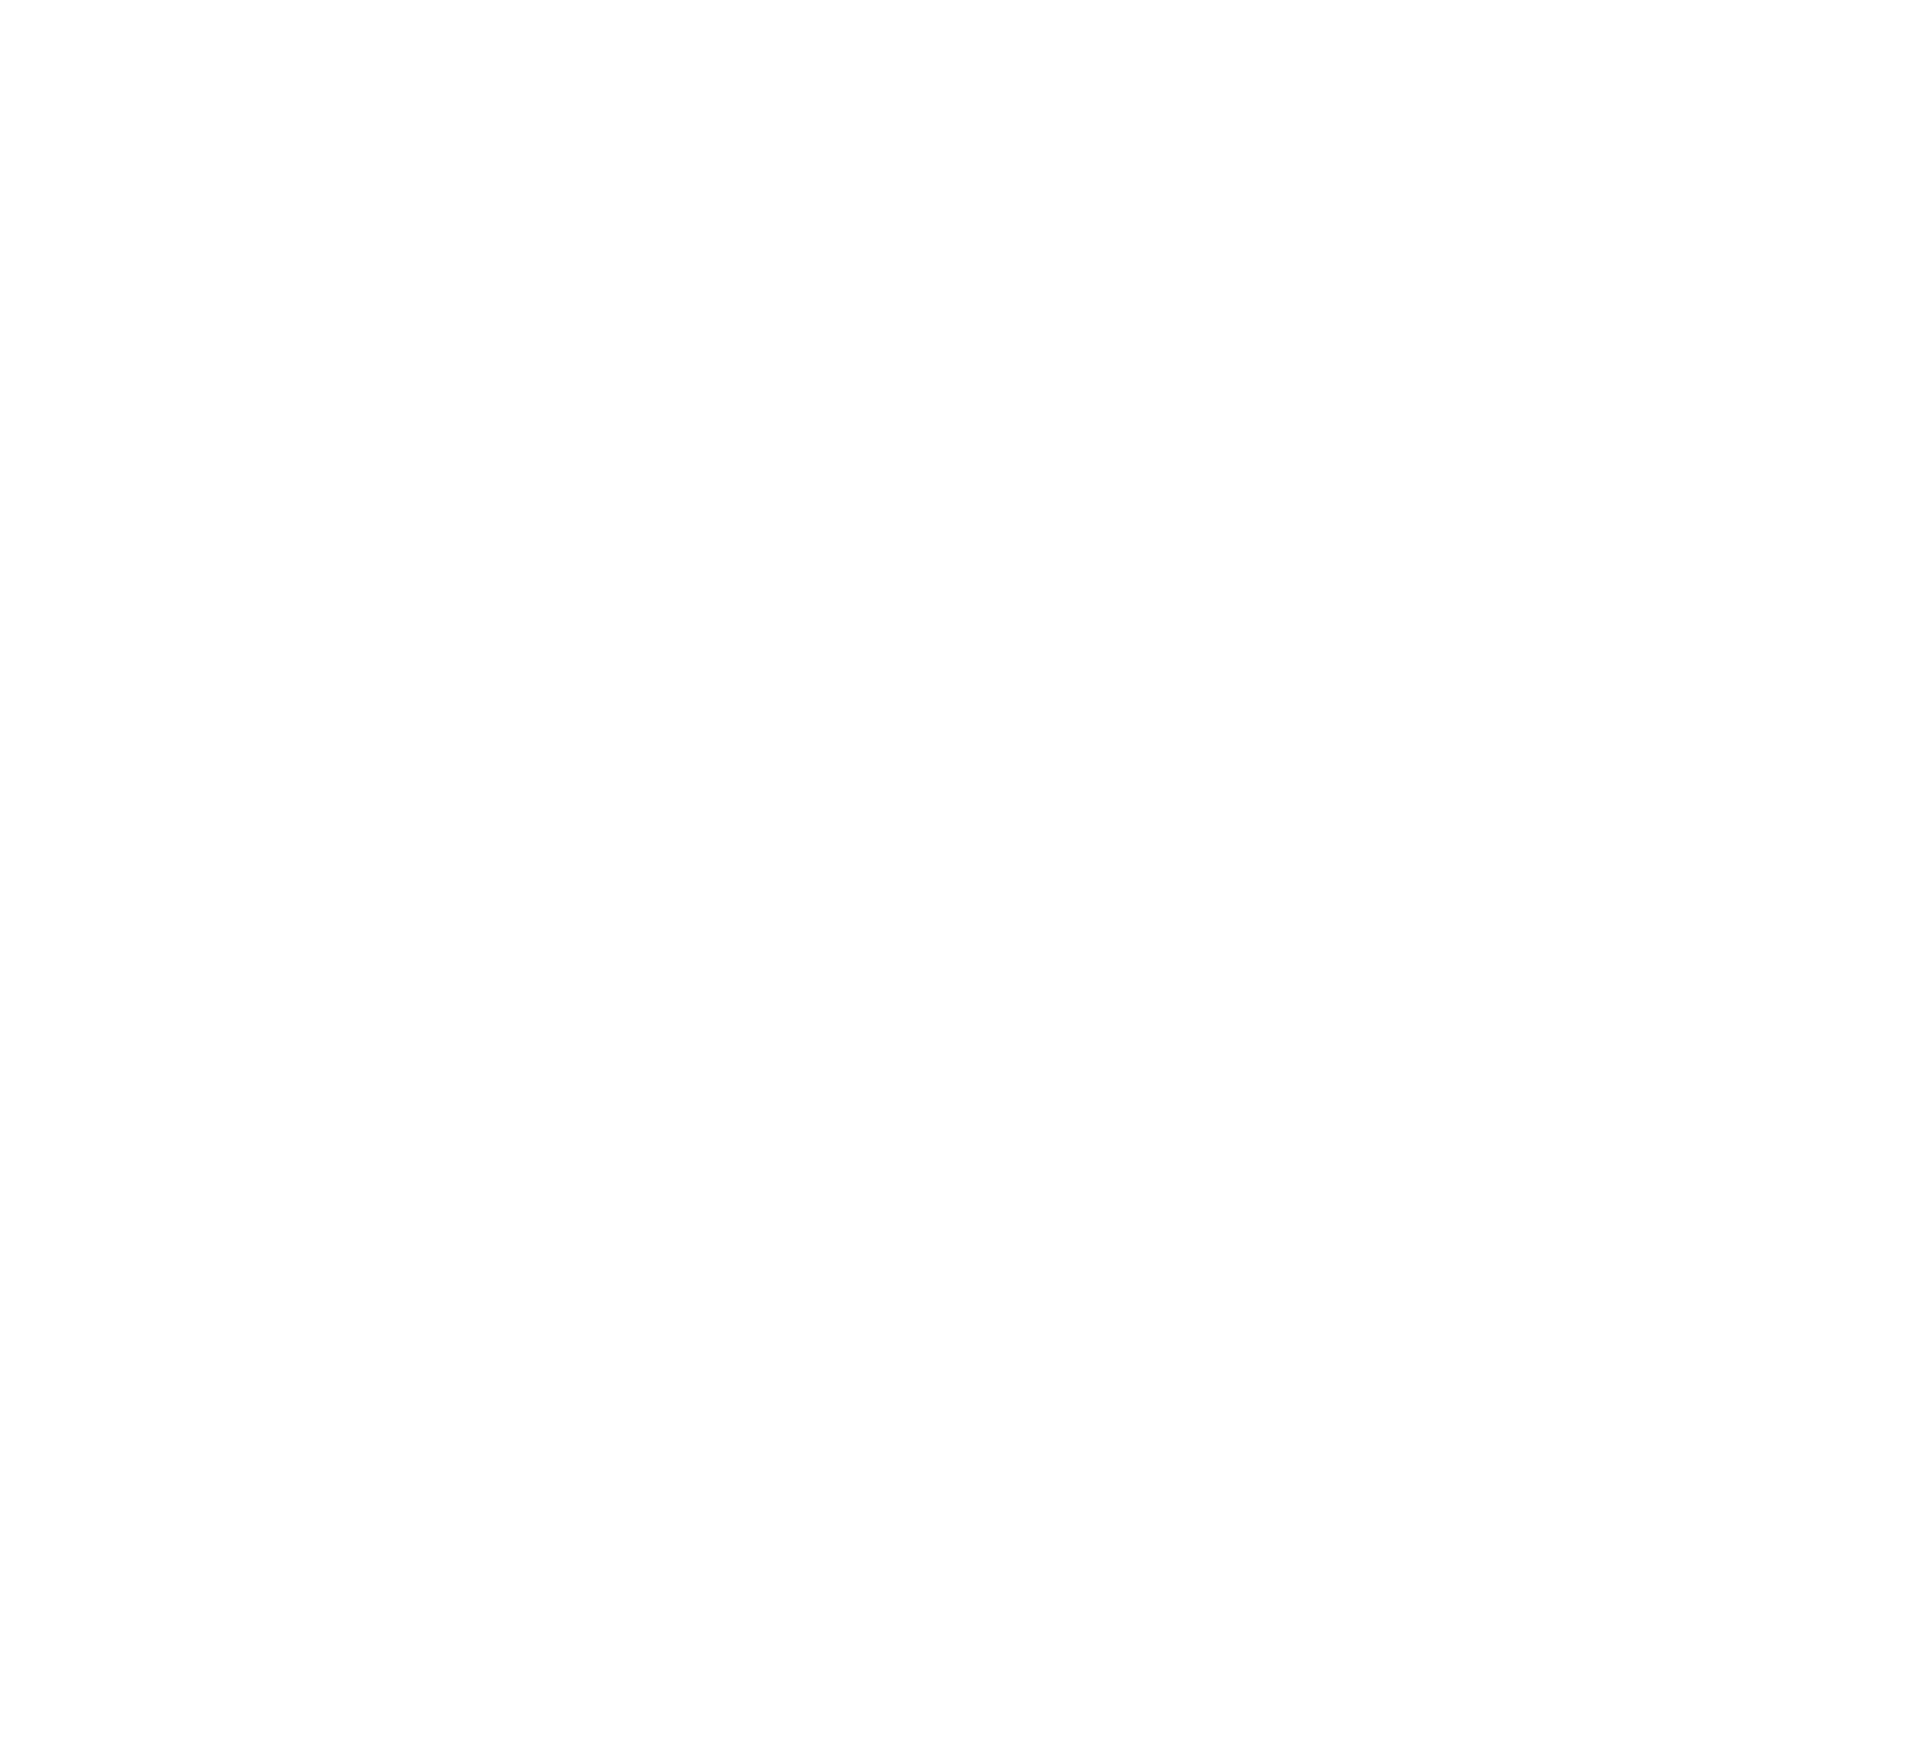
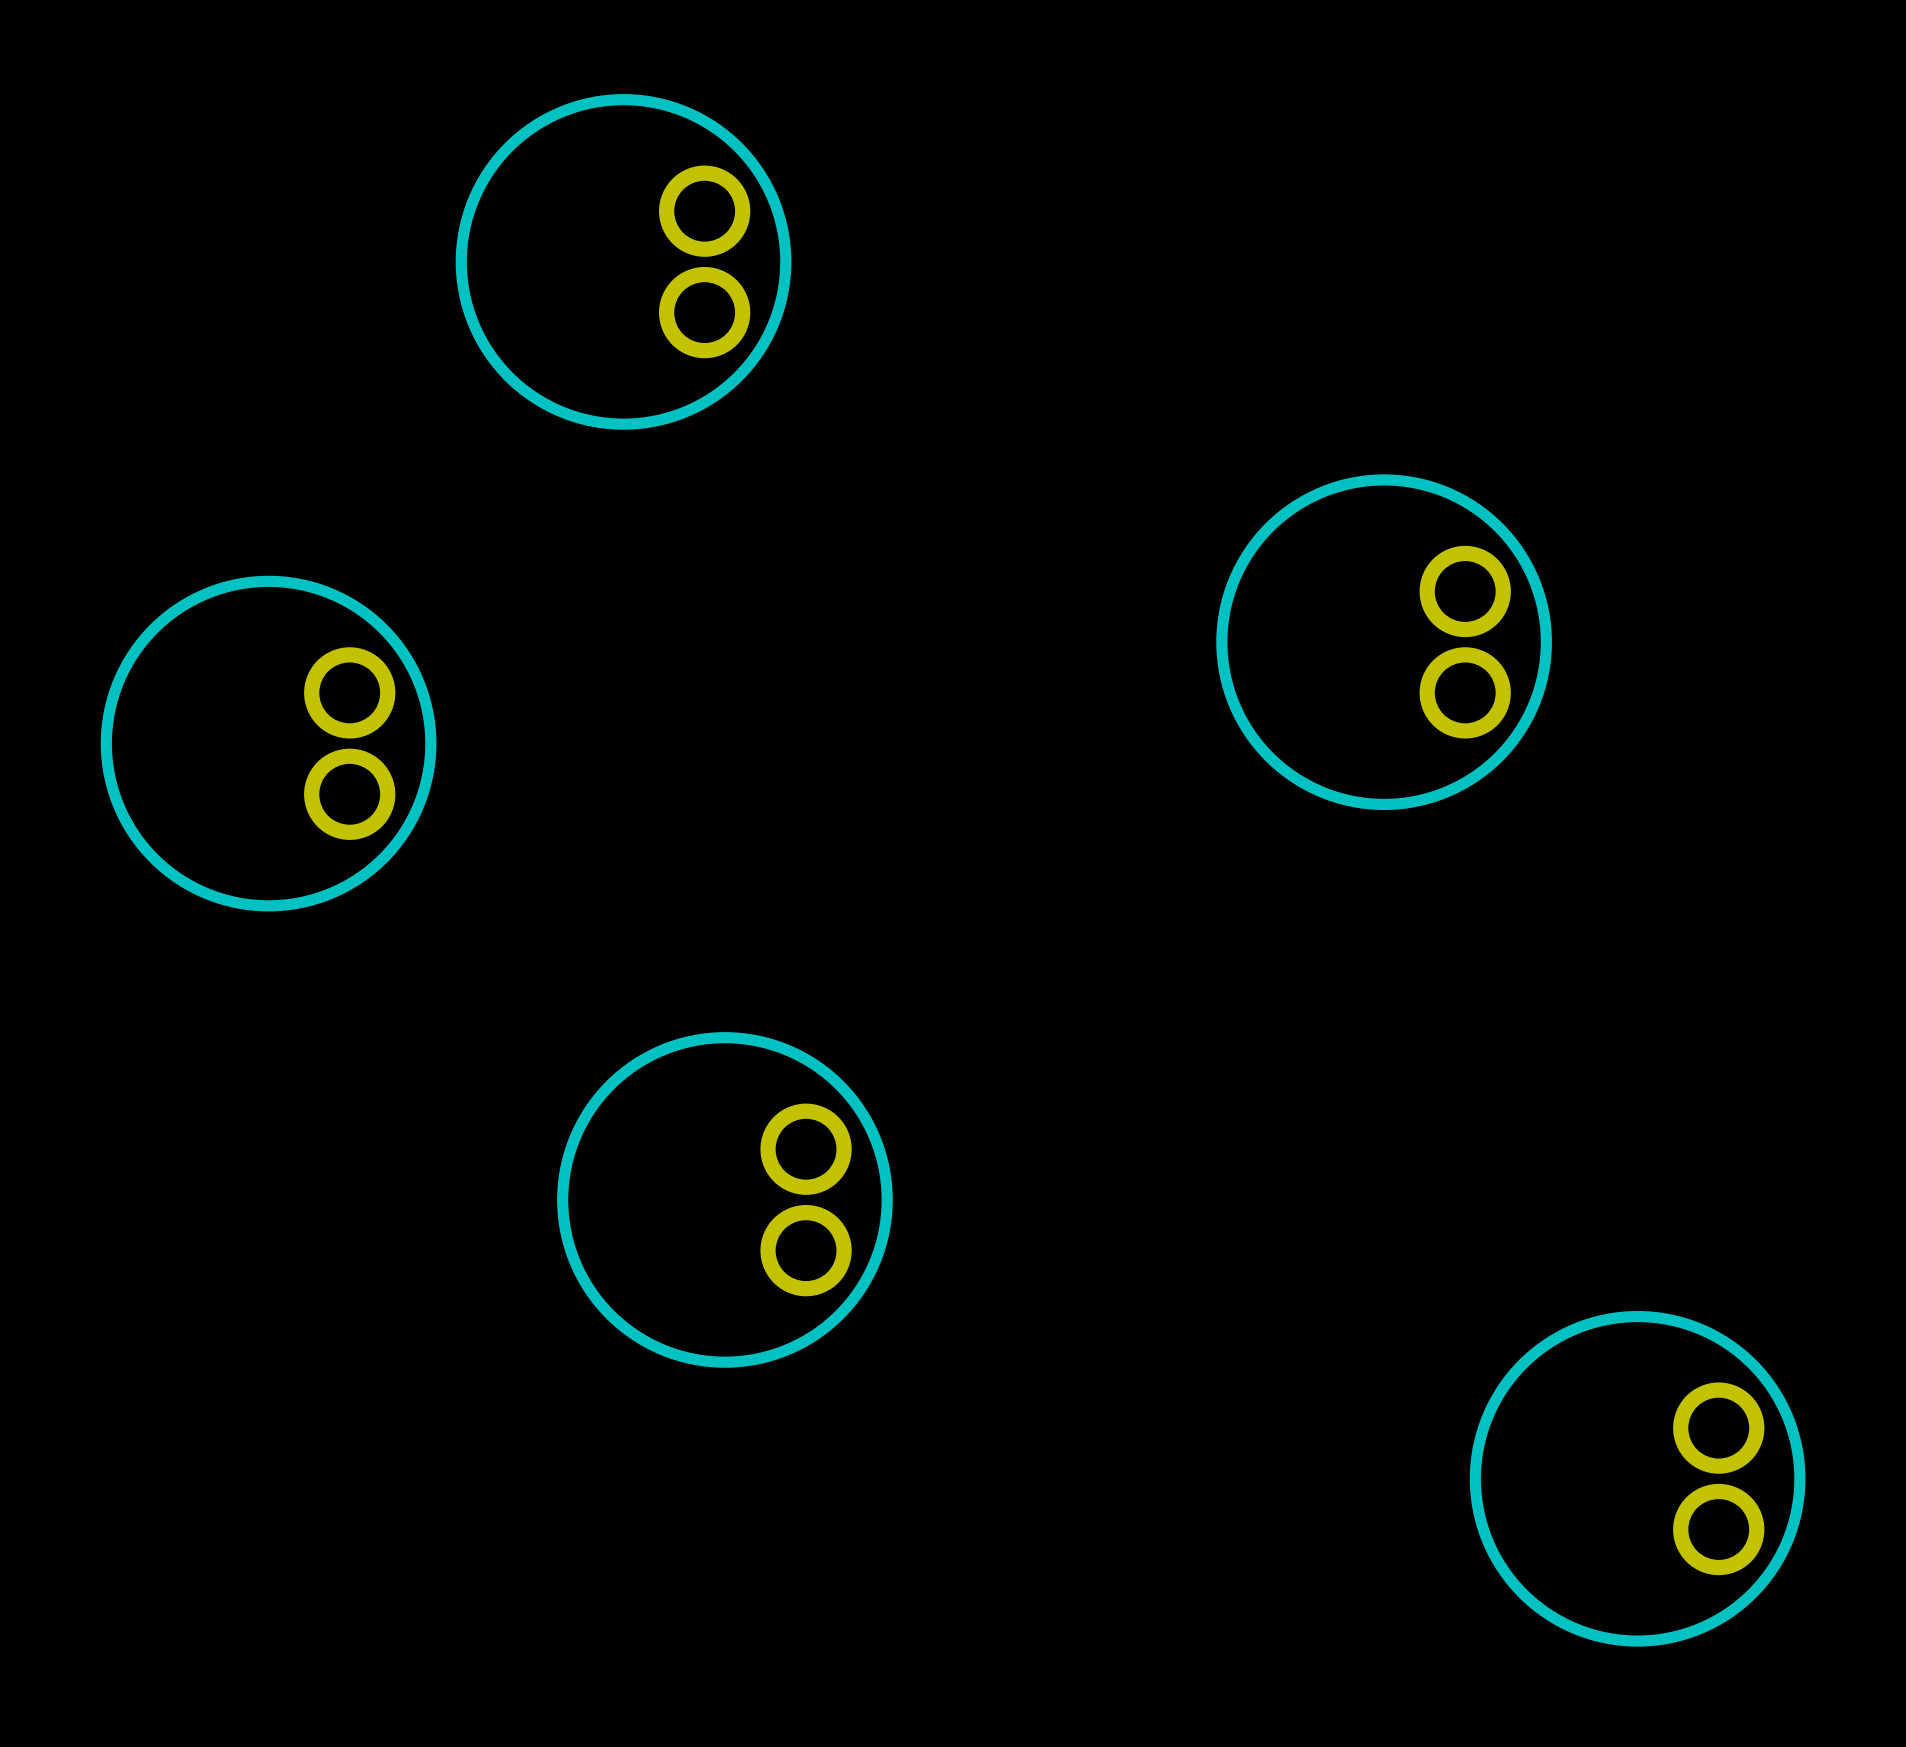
part: none -> (623, 261)
part: none -> (1384, 642)
part: none -> (268, 743)
part: none -> (724, 1199)
part: none -> (1637, 1478)

